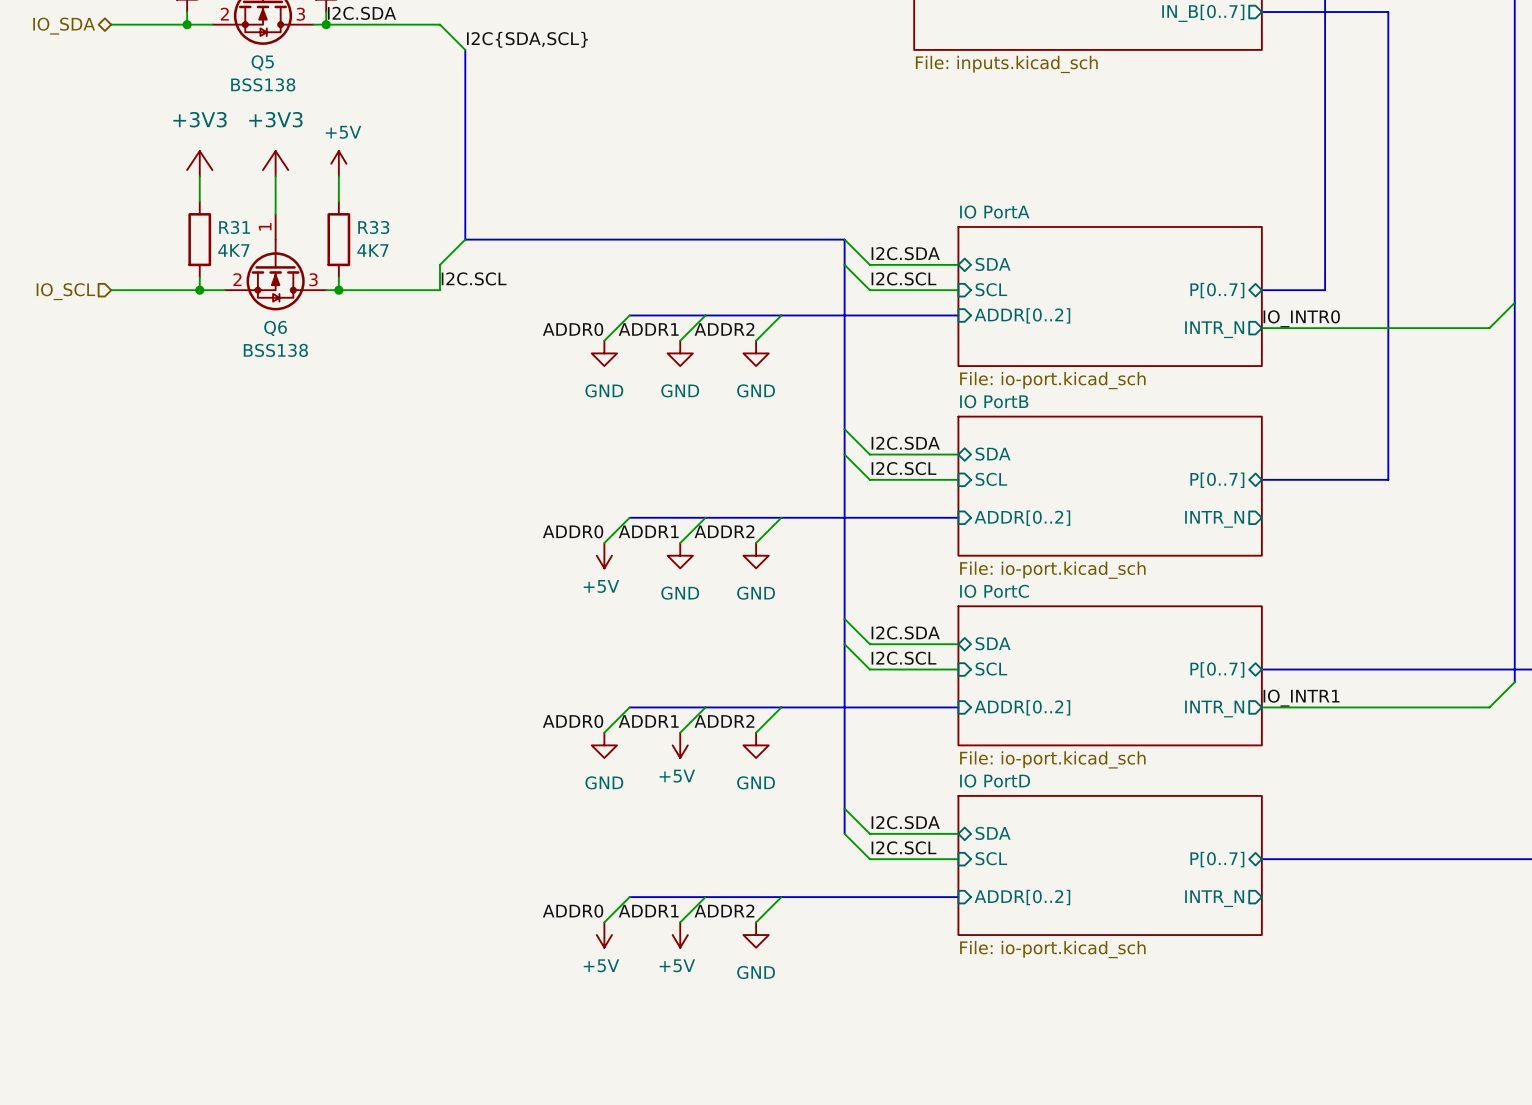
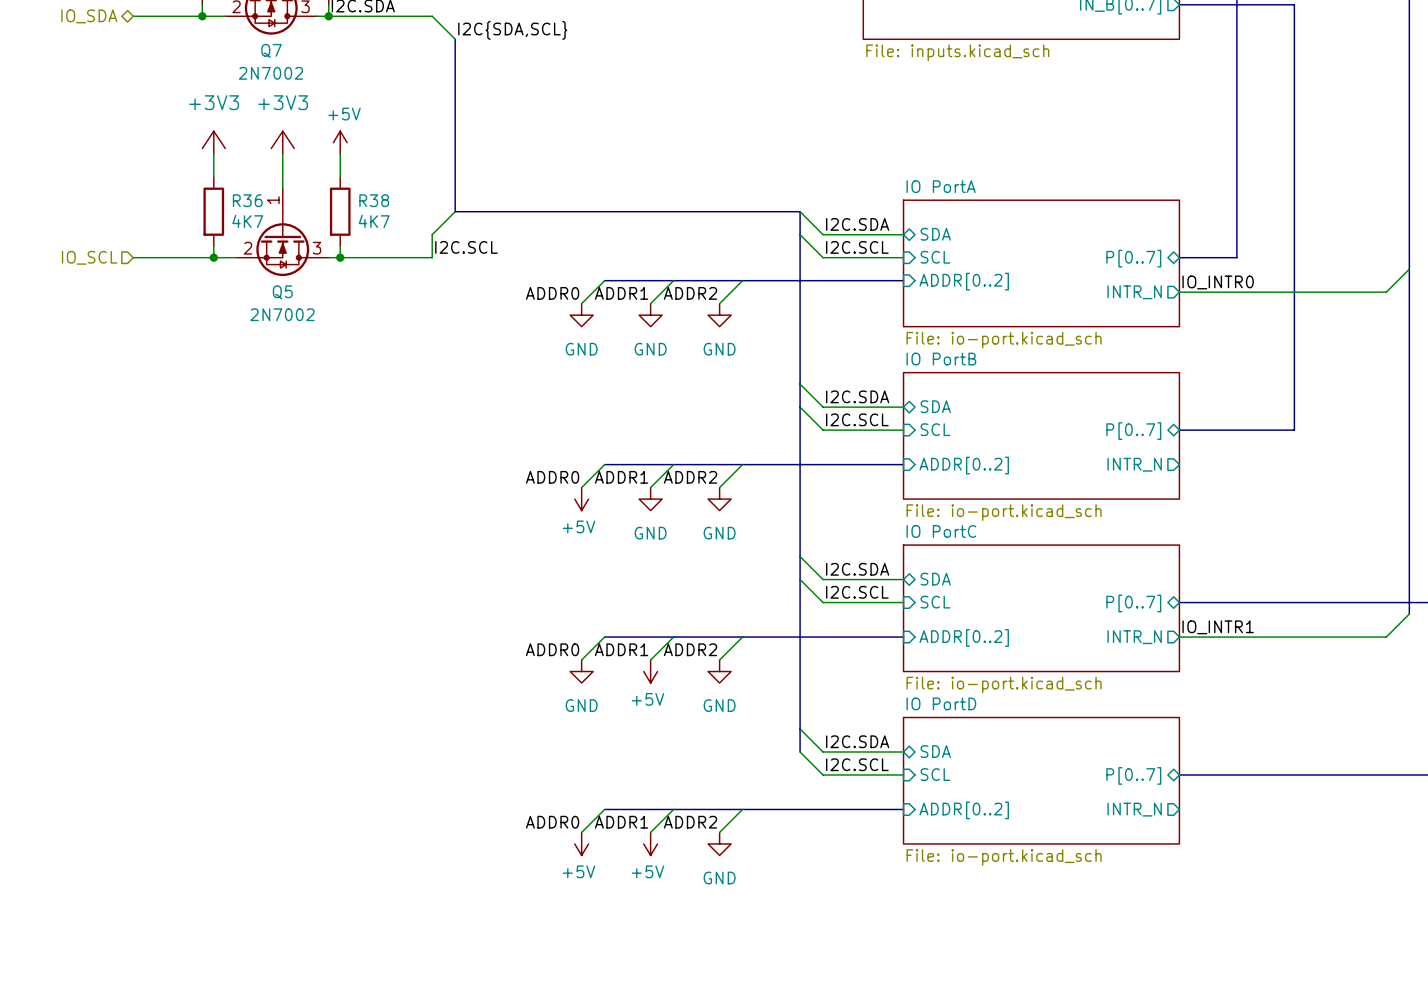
Q5 name: Q5 (262, 62) -> Q7 (271, 50)
Q5 value: BSS138 (263, 84) -> 2N7002 (270, 73)
R31 name: R31 (234, 227) -> R36 (247, 200)
R33 name: R33 (373, 227) -> R38 (374, 200)
Q6 name: Q6 (275, 328) -> Q5 (282, 292)
Q6 value: BSS138 (275, 350) -> 2N7002 (282, 314)

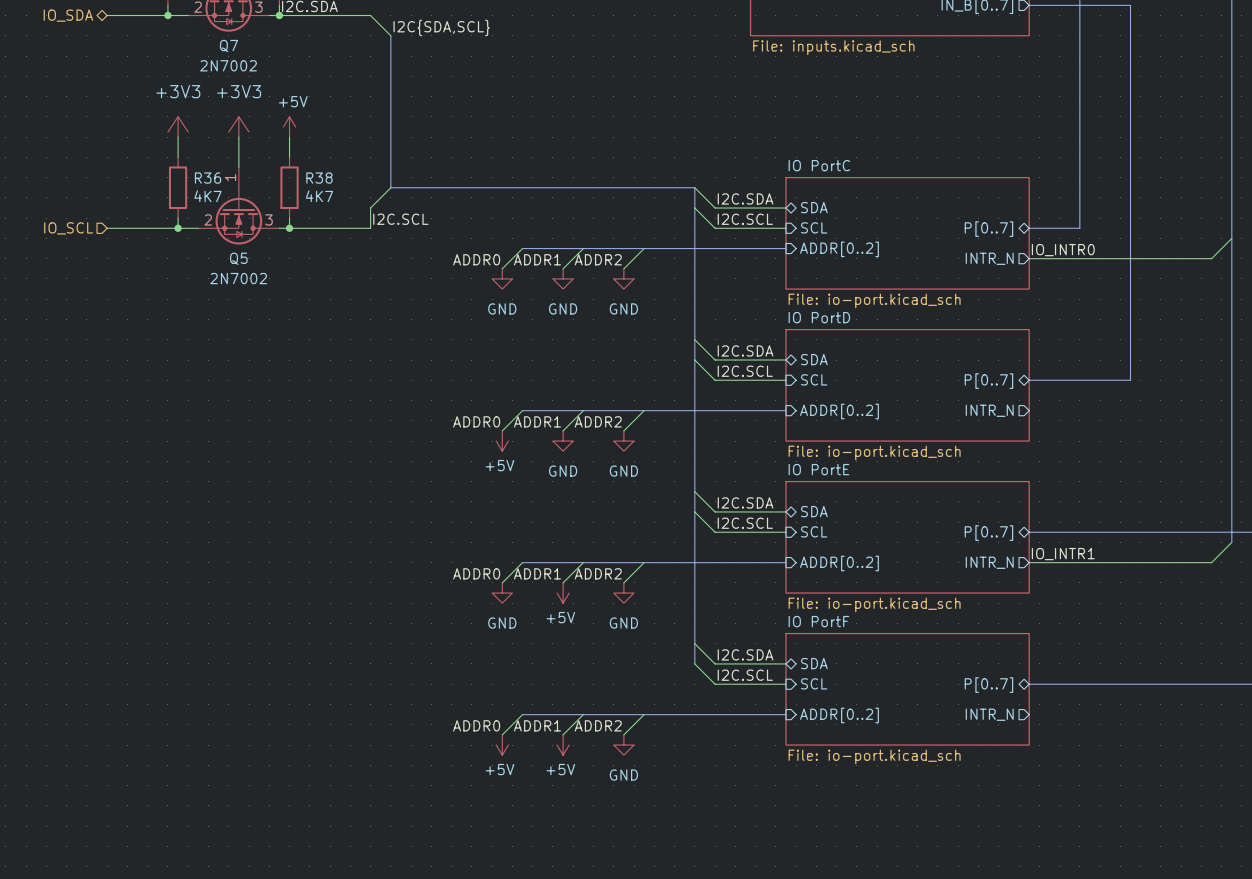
sheet IO PortA name: IO PortA (941, 186) -> IO PortC (819, 165)
sheet IO PortB name: IO PortB (941, 359) -> IO PortD (819, 317)
sheet IO PortC name: IO PortC (941, 531) -> IO PortE (818, 469)
sheet IO PortD name: IO PortD (941, 703) -> IO PortF (818, 621)

